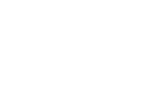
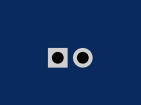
part: none -> (70, 57)

